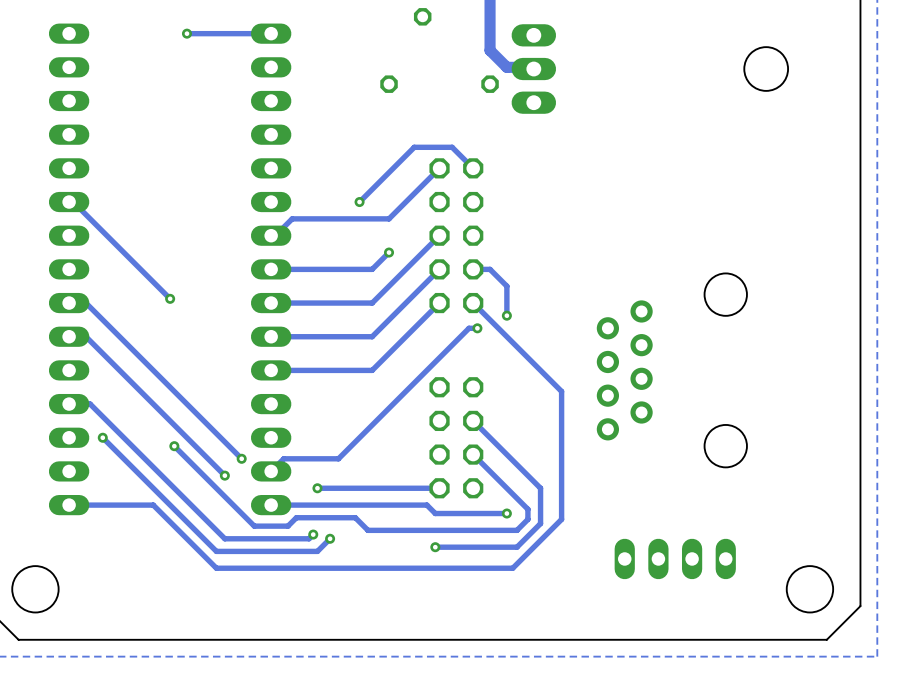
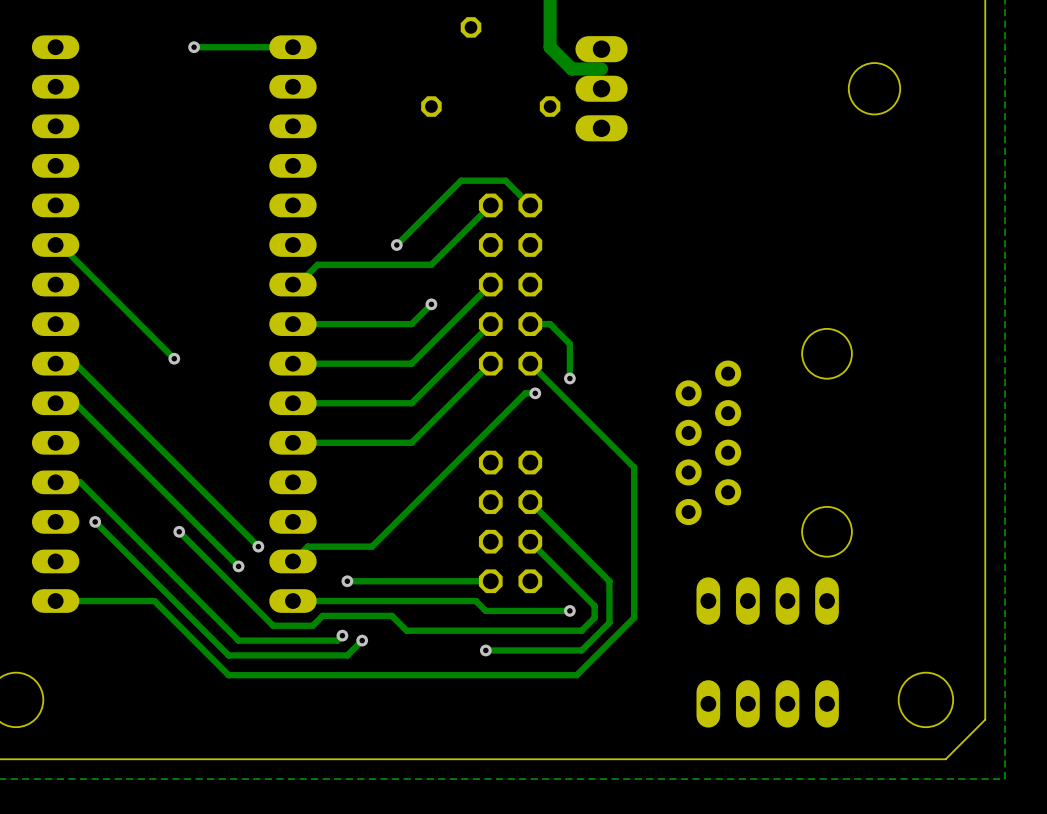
track: (490, 33) (490, 50) (506, 67) (532, 67) (533, 69) -> (550, 47) (571, 68) (601, 68)
part: none -> (767, 601)
part: (675, 558) -> none
part: none -> (767, 703)

